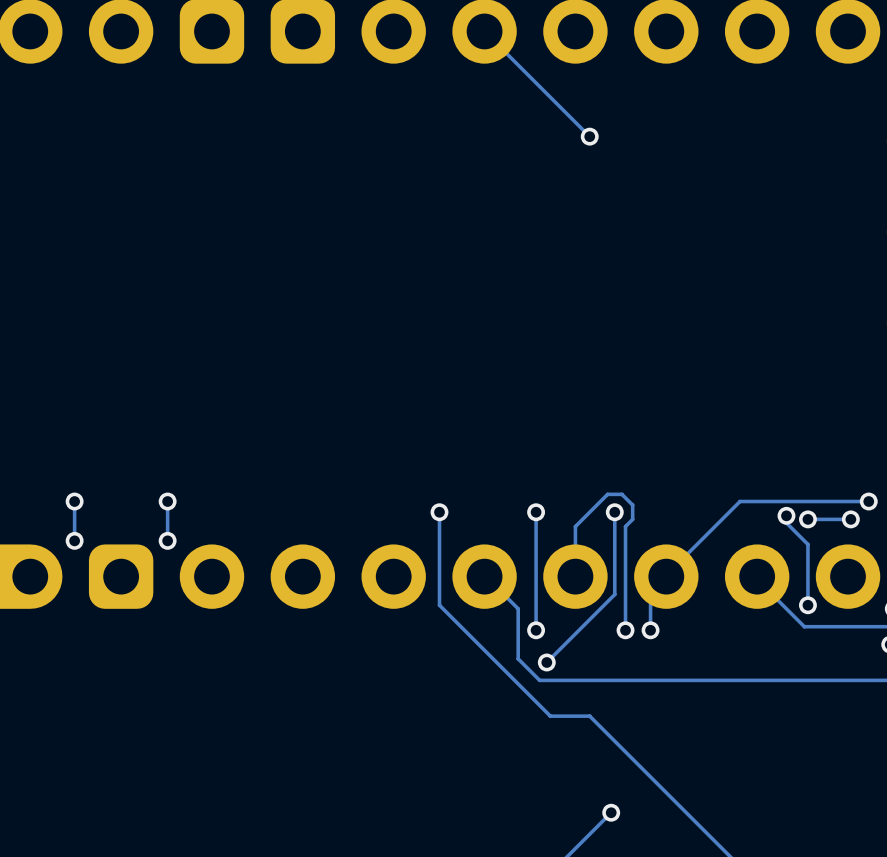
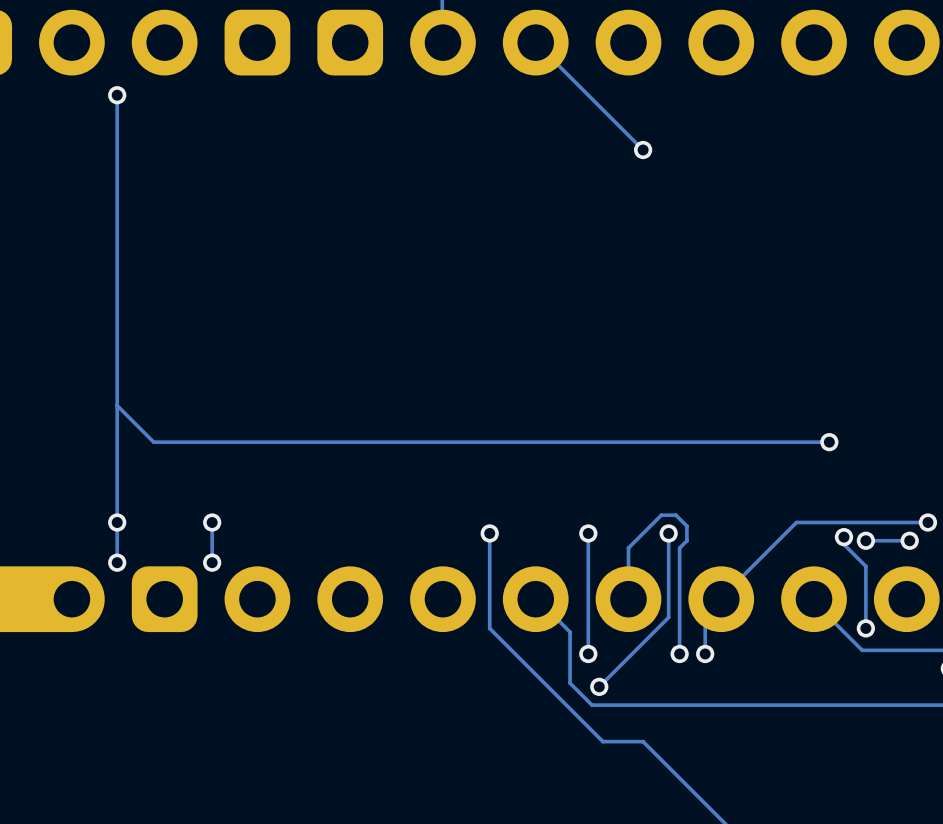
track: none -> (117, 95) (117, 522)
via: none -> (117, 95)
track: none -> (117, 405) (153, 442) (829, 442)
via: none -> (829, 442)

